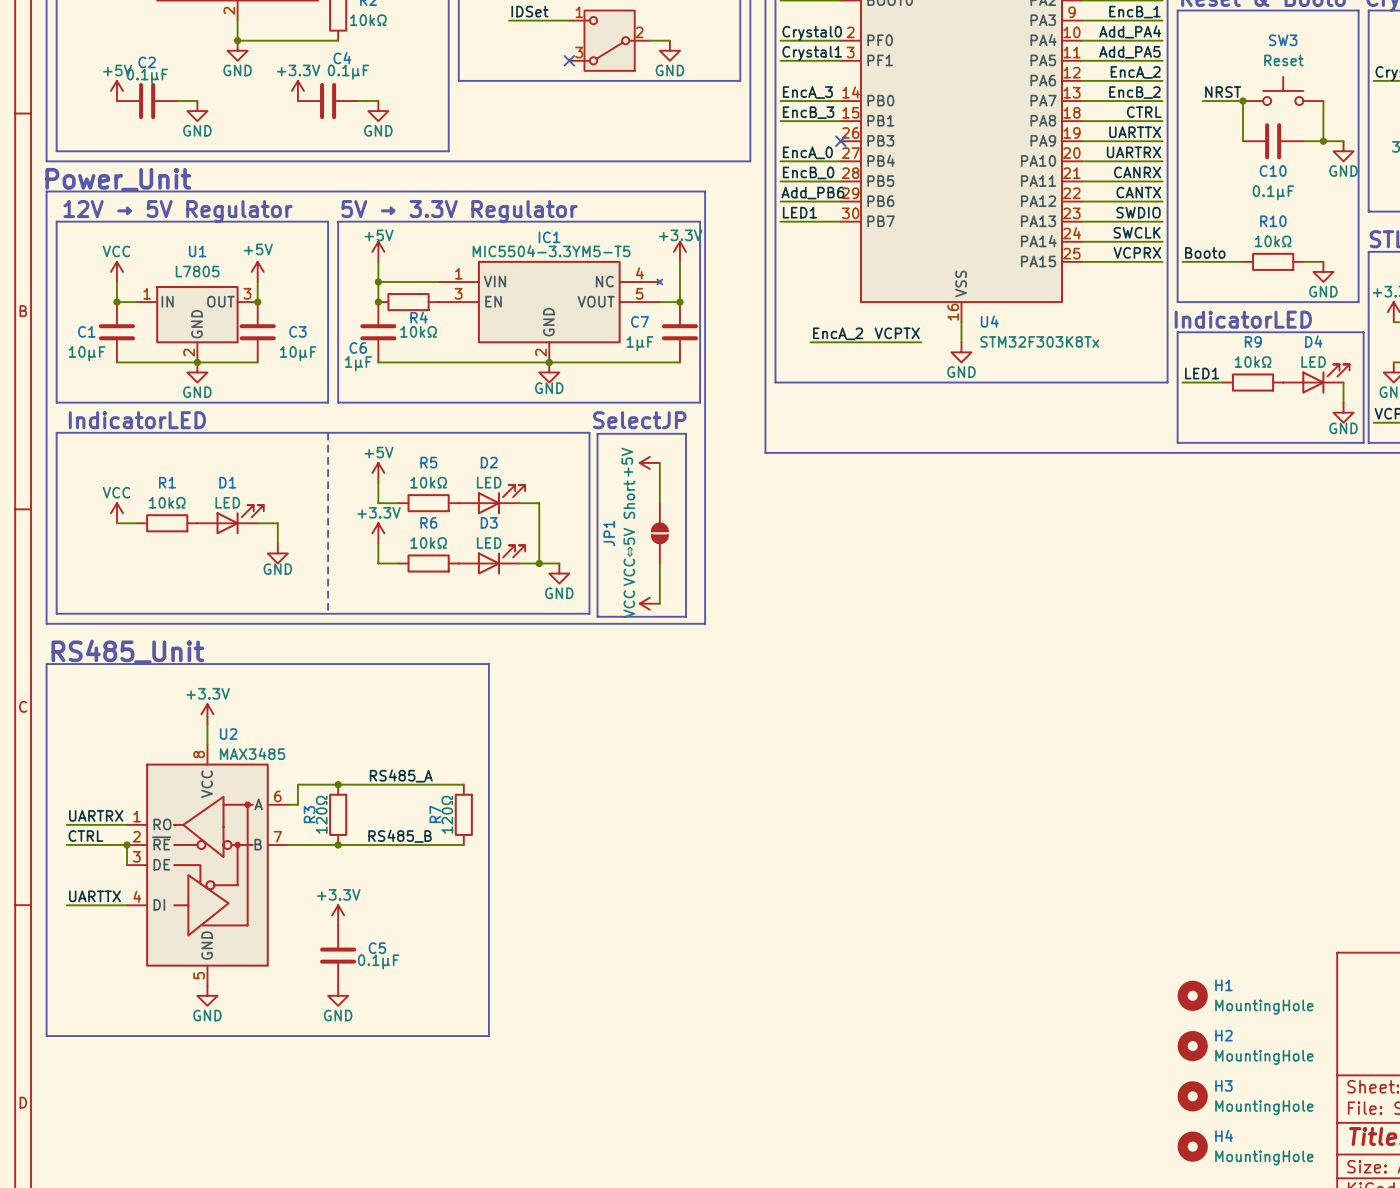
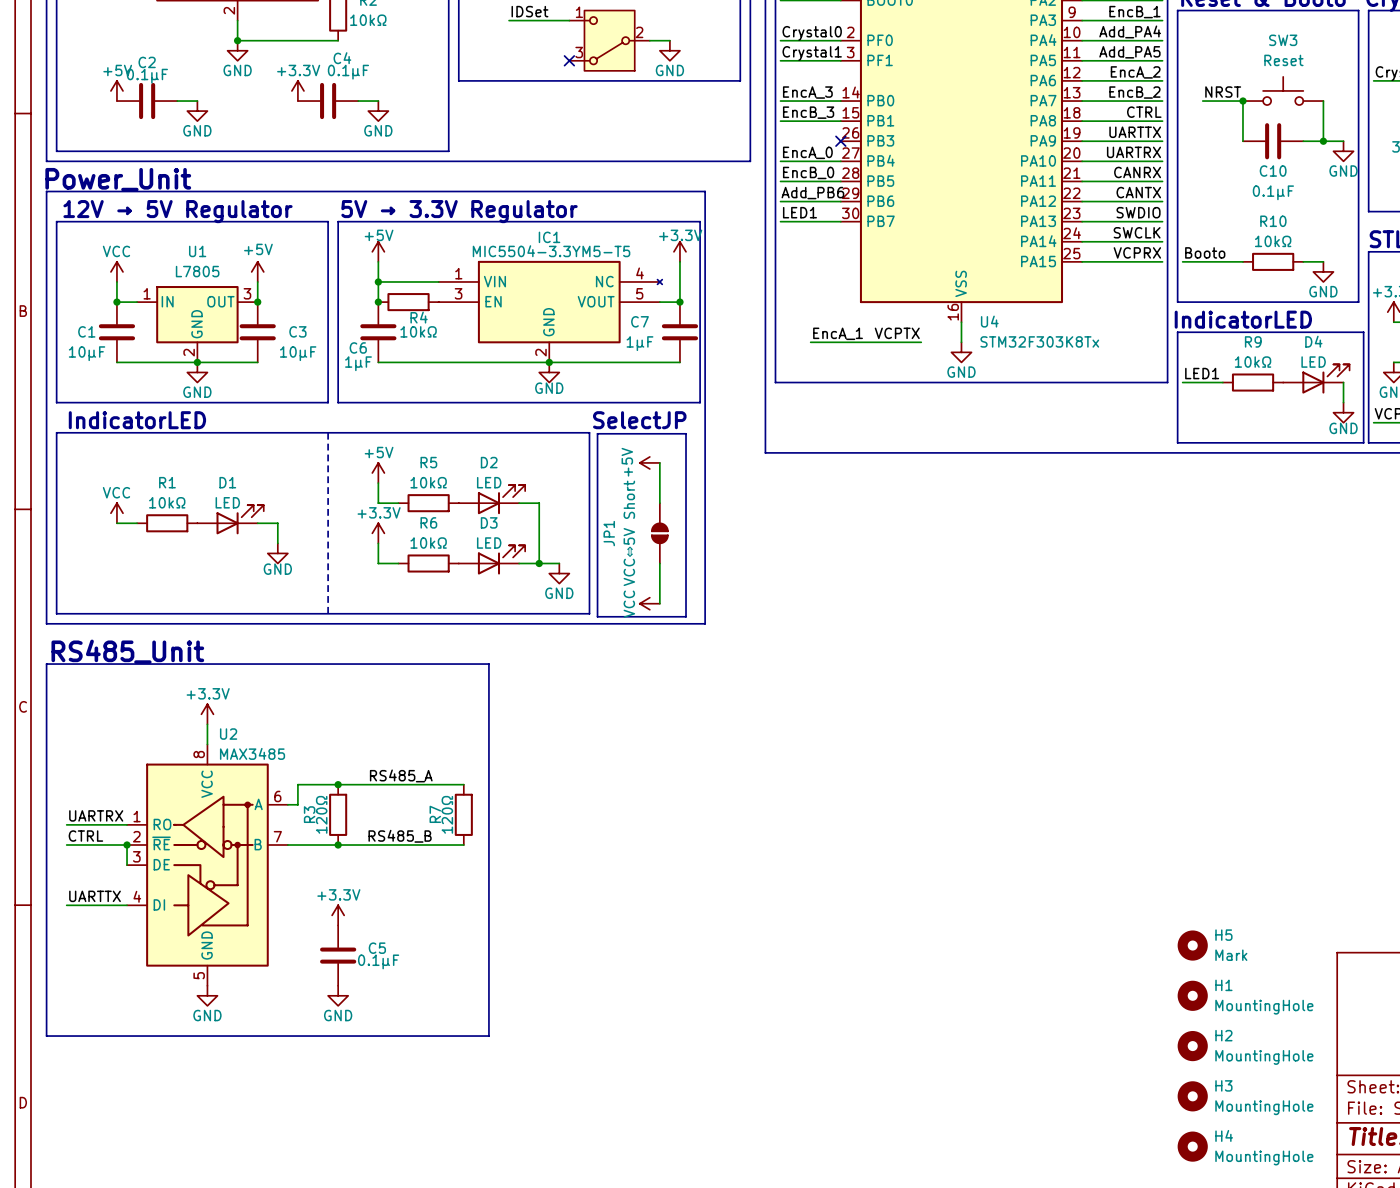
label: EncA_2 (838, 333) -> EncA_1 (838, 333)
H5: none -> Mark (1192, 945)

